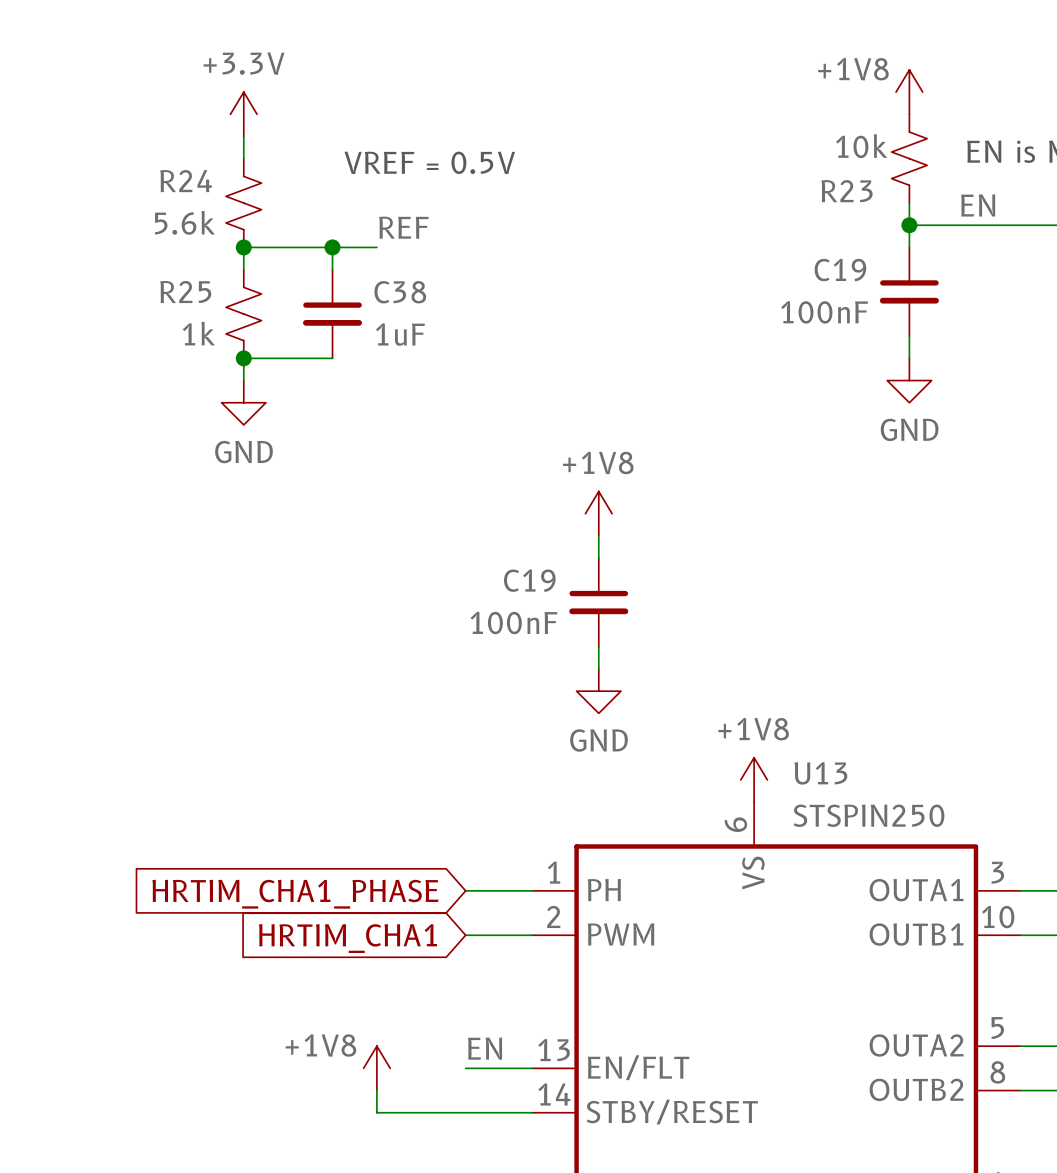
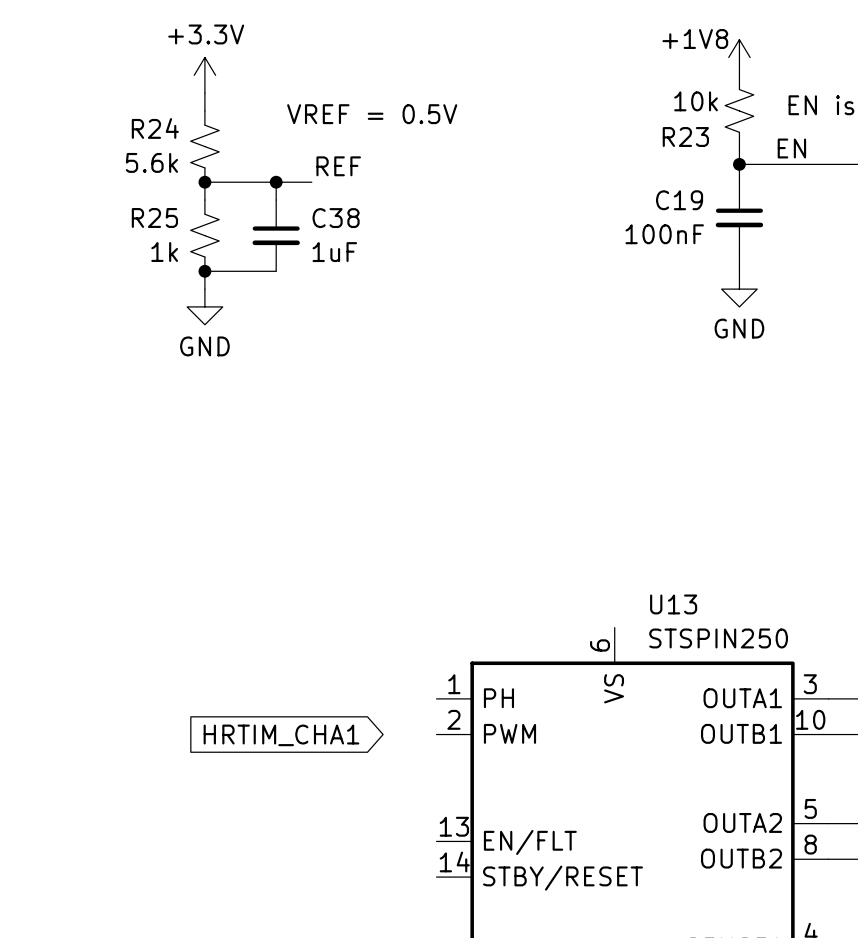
power symbol: +1V8 (598, 513) -> none
wire: (598, 535) (598, 558) -> none
C19: 100nF (598, 602) -> none
wire: (598, 646) (598, 668) -> none
power symbol: GND (598, 691) -> none
power symbol: +1V8 (754, 779) -> none
wire: (465, 890) (532, 890) -> none
global label: HRTIM_CHA1_PHASE (295, 894) -> none
wire: (465, 935) (532, 935) -> none
label: EN (485, 1048) -> none
power symbol: +1V8 (376, 1068) -> none
wire: (465, 1068) (532, 1068) -> none
wire: (376, 1090) (376, 1112) (532, 1112) -> none

